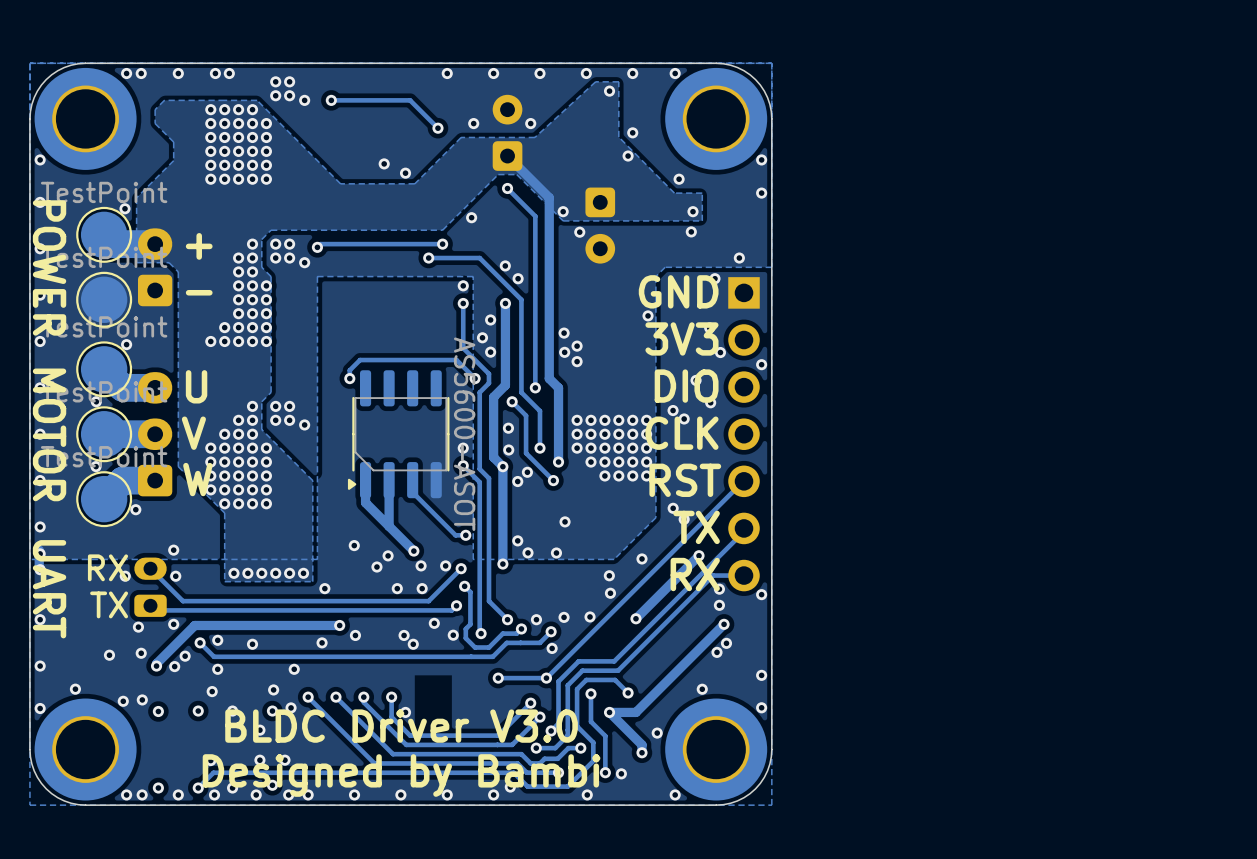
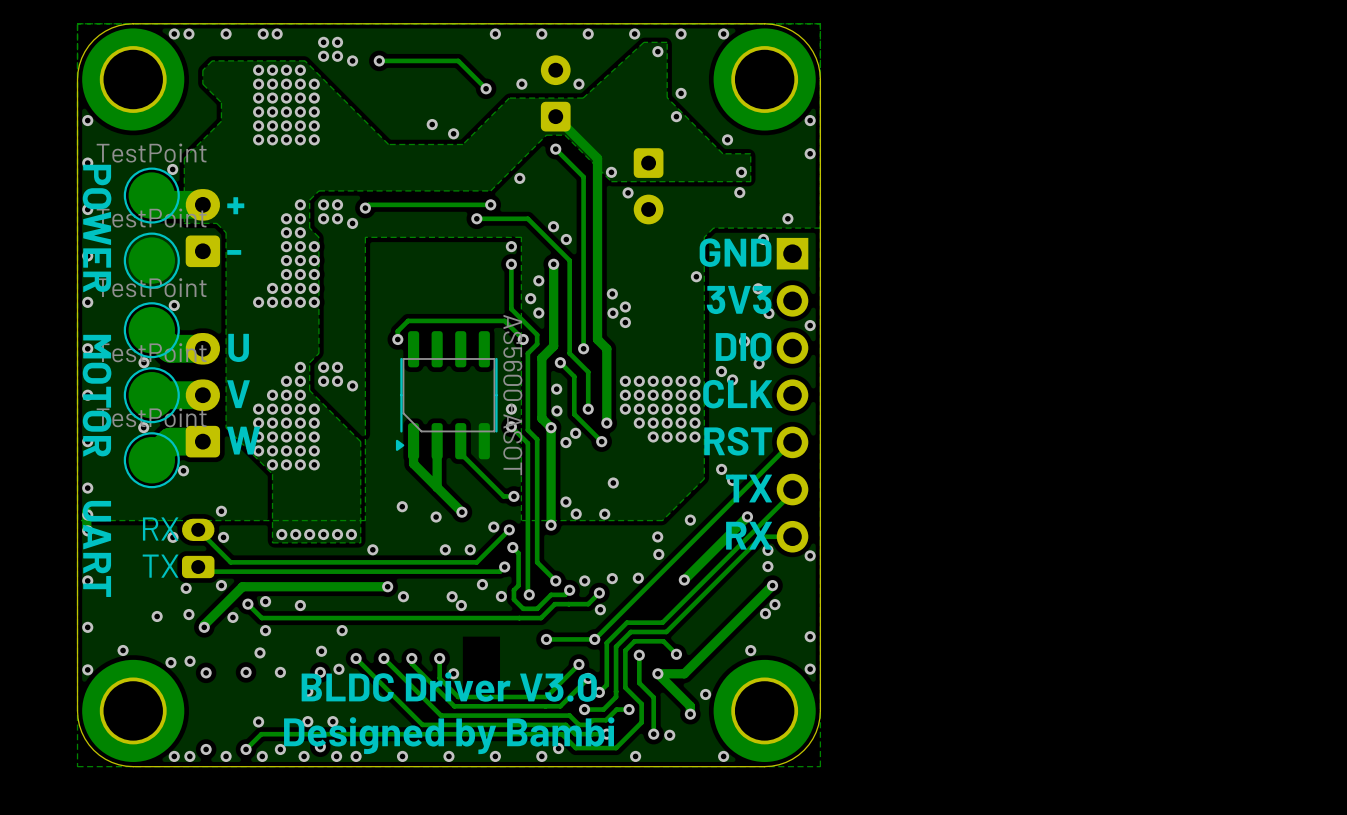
via: (421, 565) -> none
via: (376, 567) -> none
via: (322, 642) -> none
via: (174, 666) -> none

